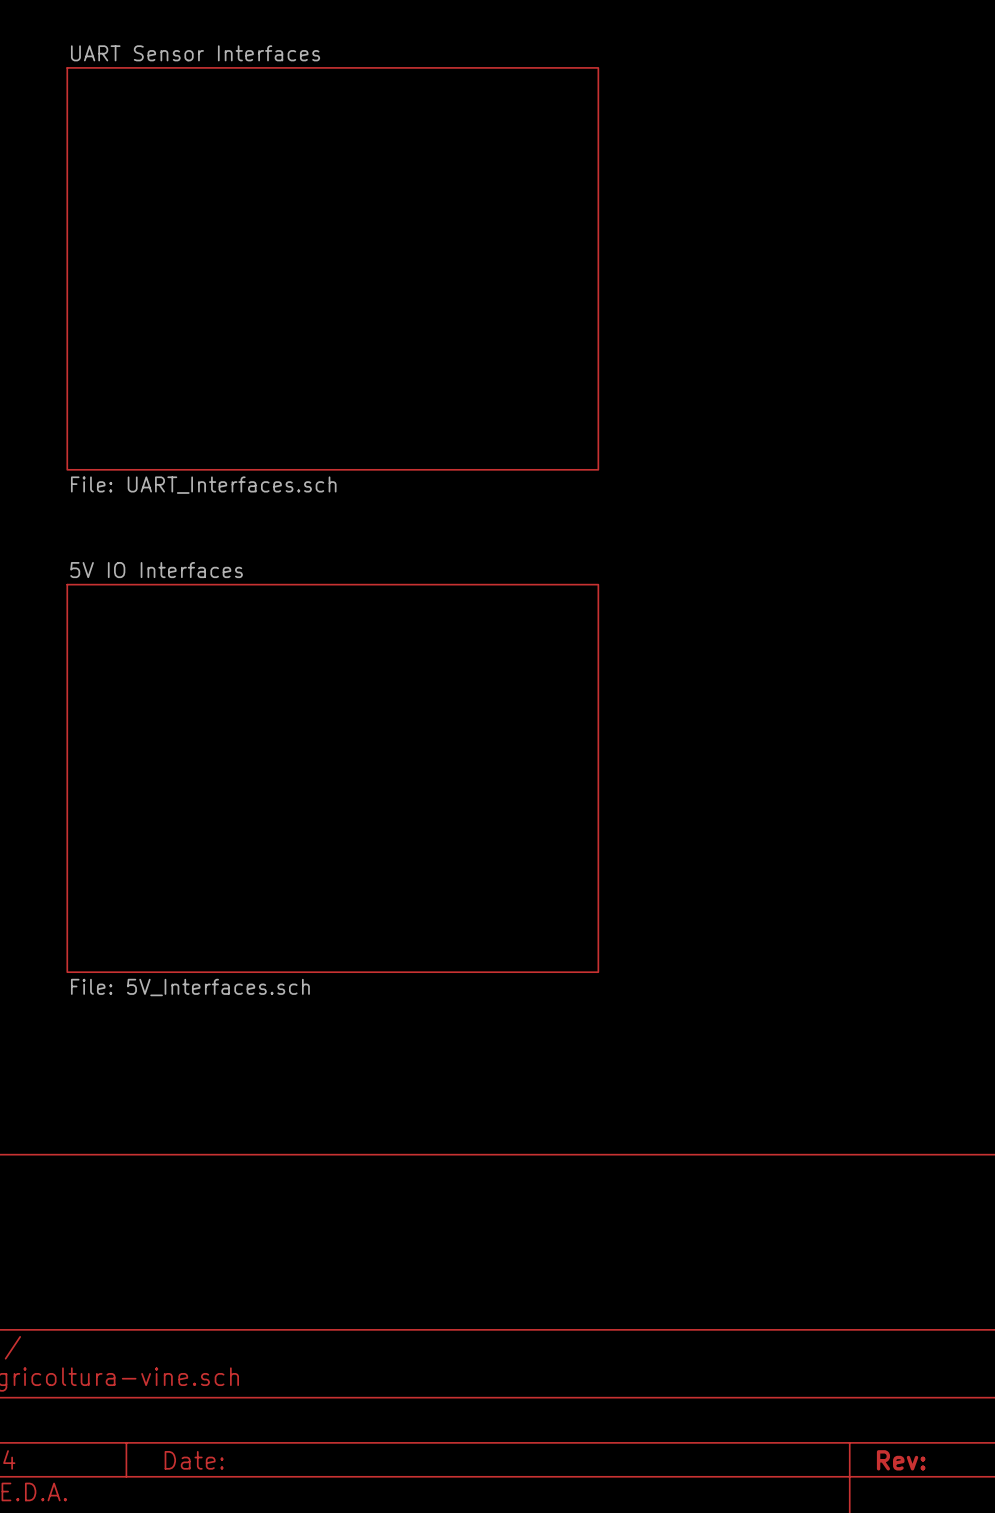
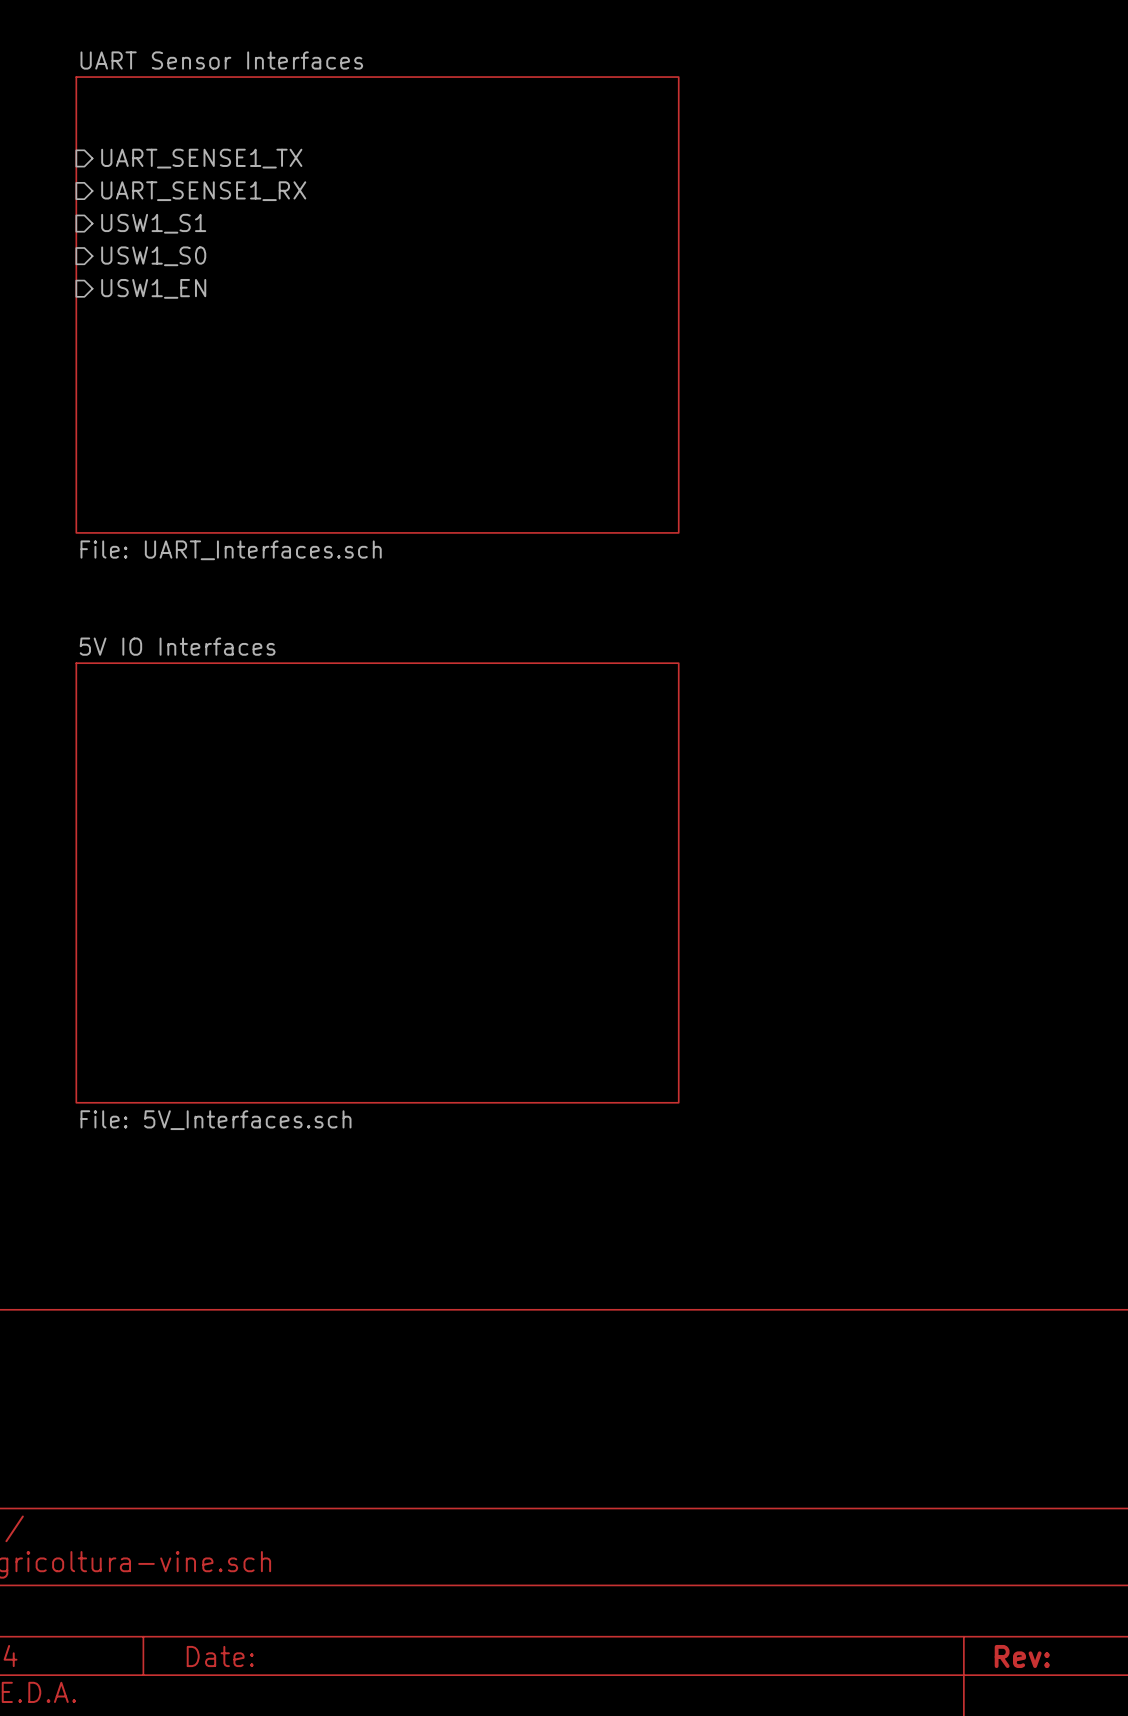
sheet pin: none -> UART_SENSE1_TX (201, 158)
sheet pin: none -> UART_SENSE1_RX (203, 191)
sheet pin: none -> USW1_S1 (153, 223)
sheet pin: none -> USW1_S0 (153, 256)
sheet pin: none -> USW1_EN (153, 288)

